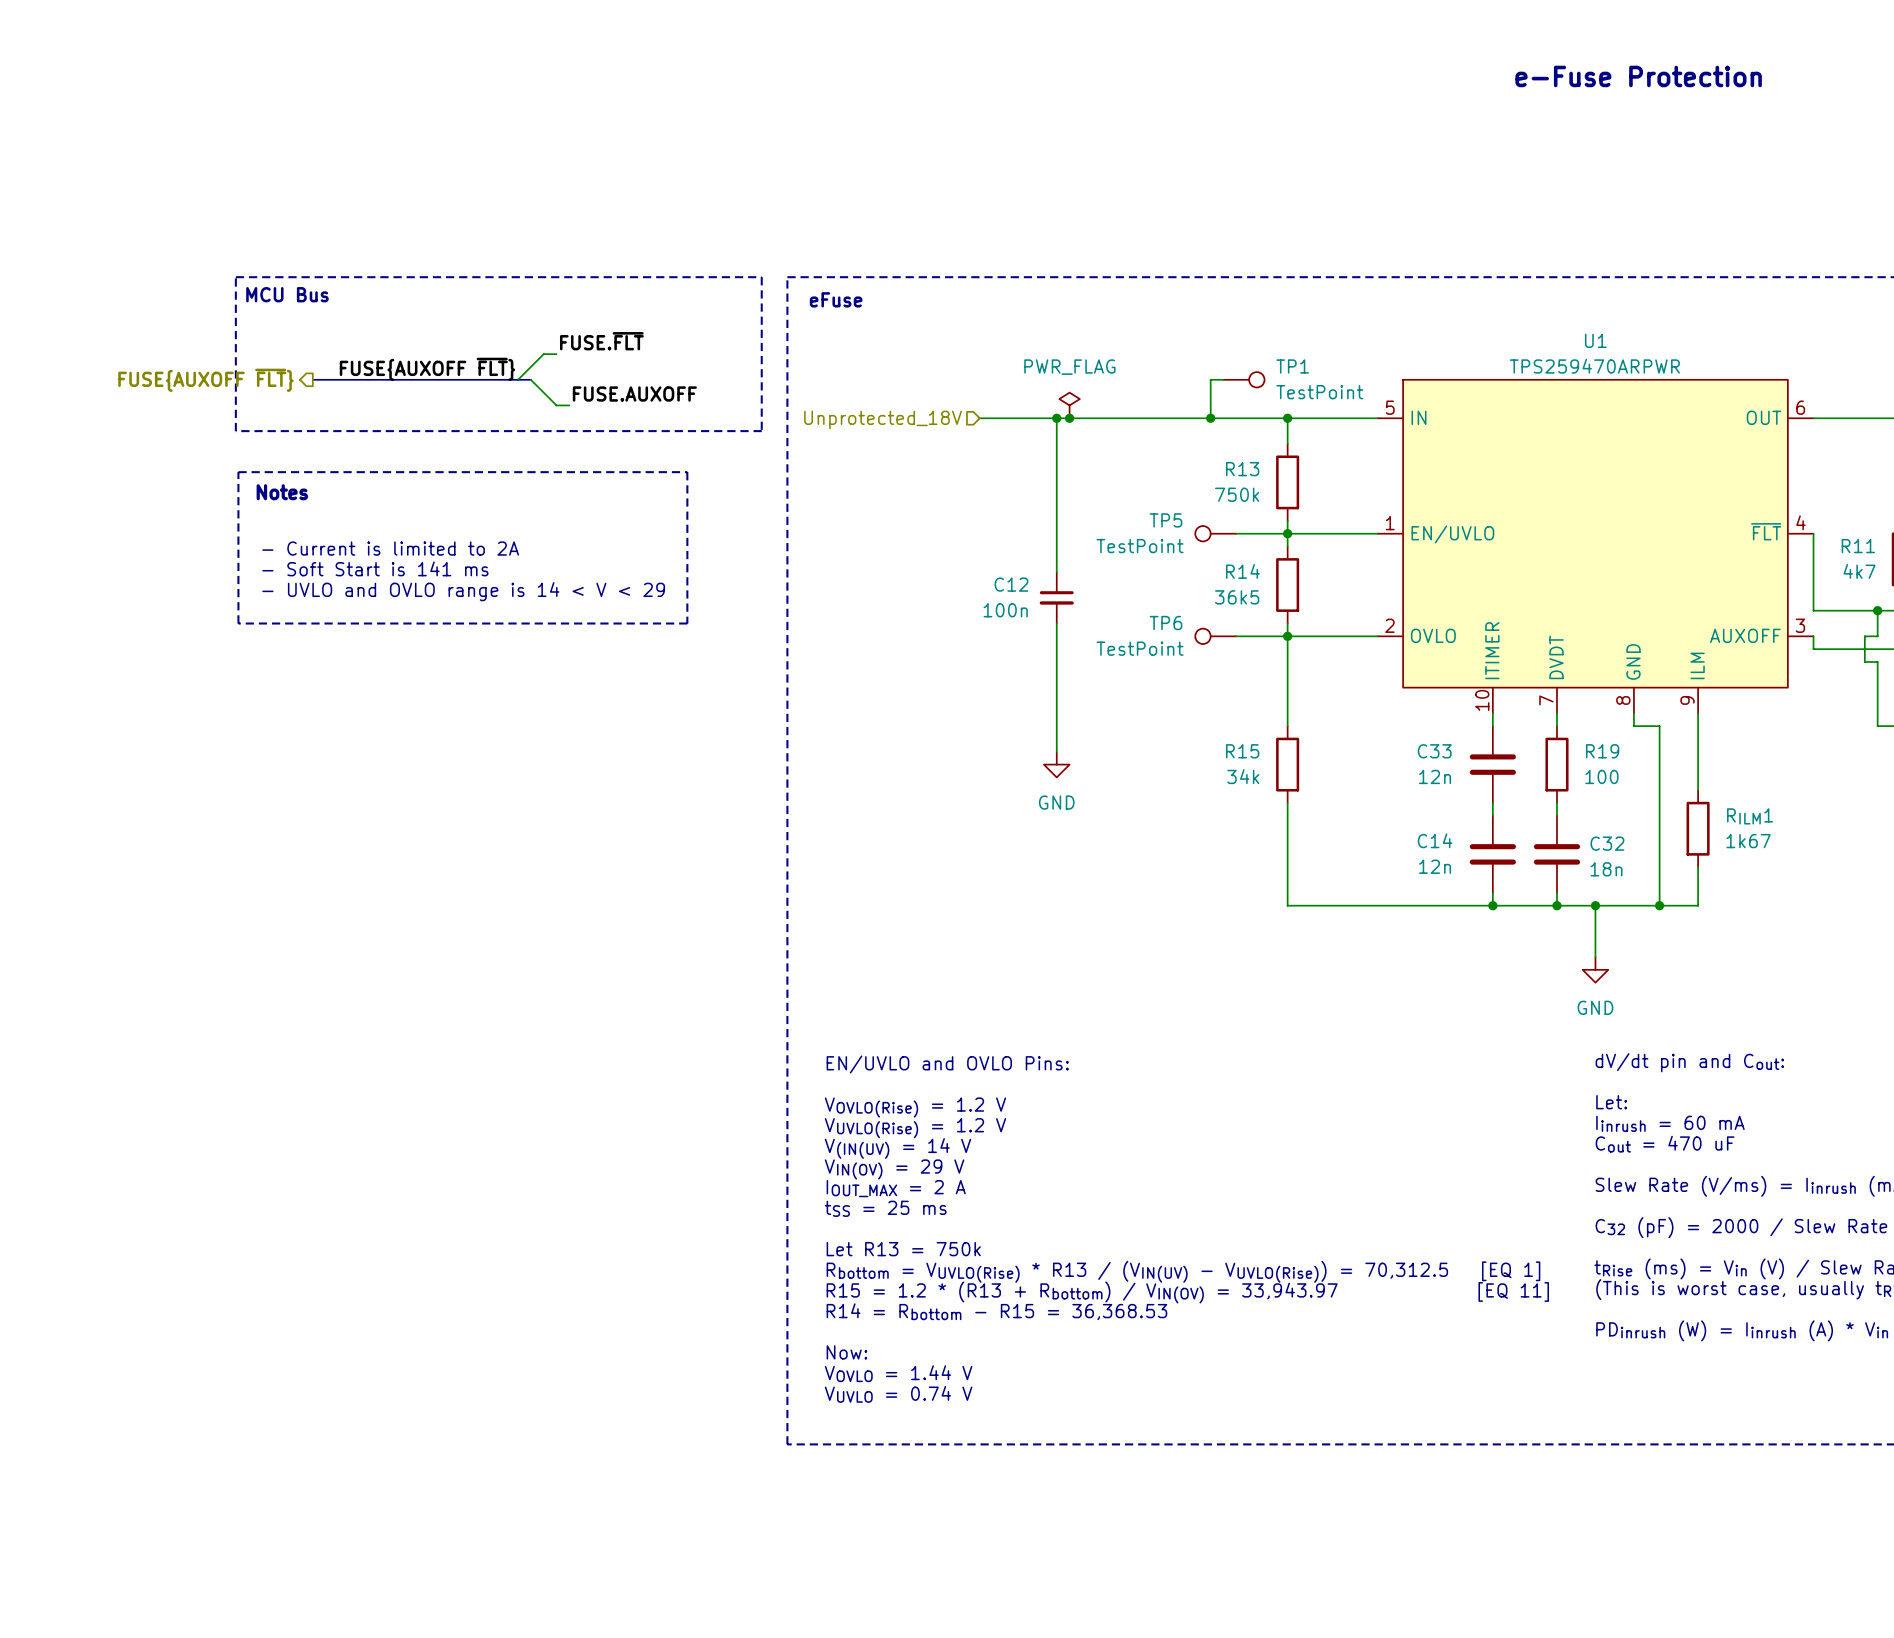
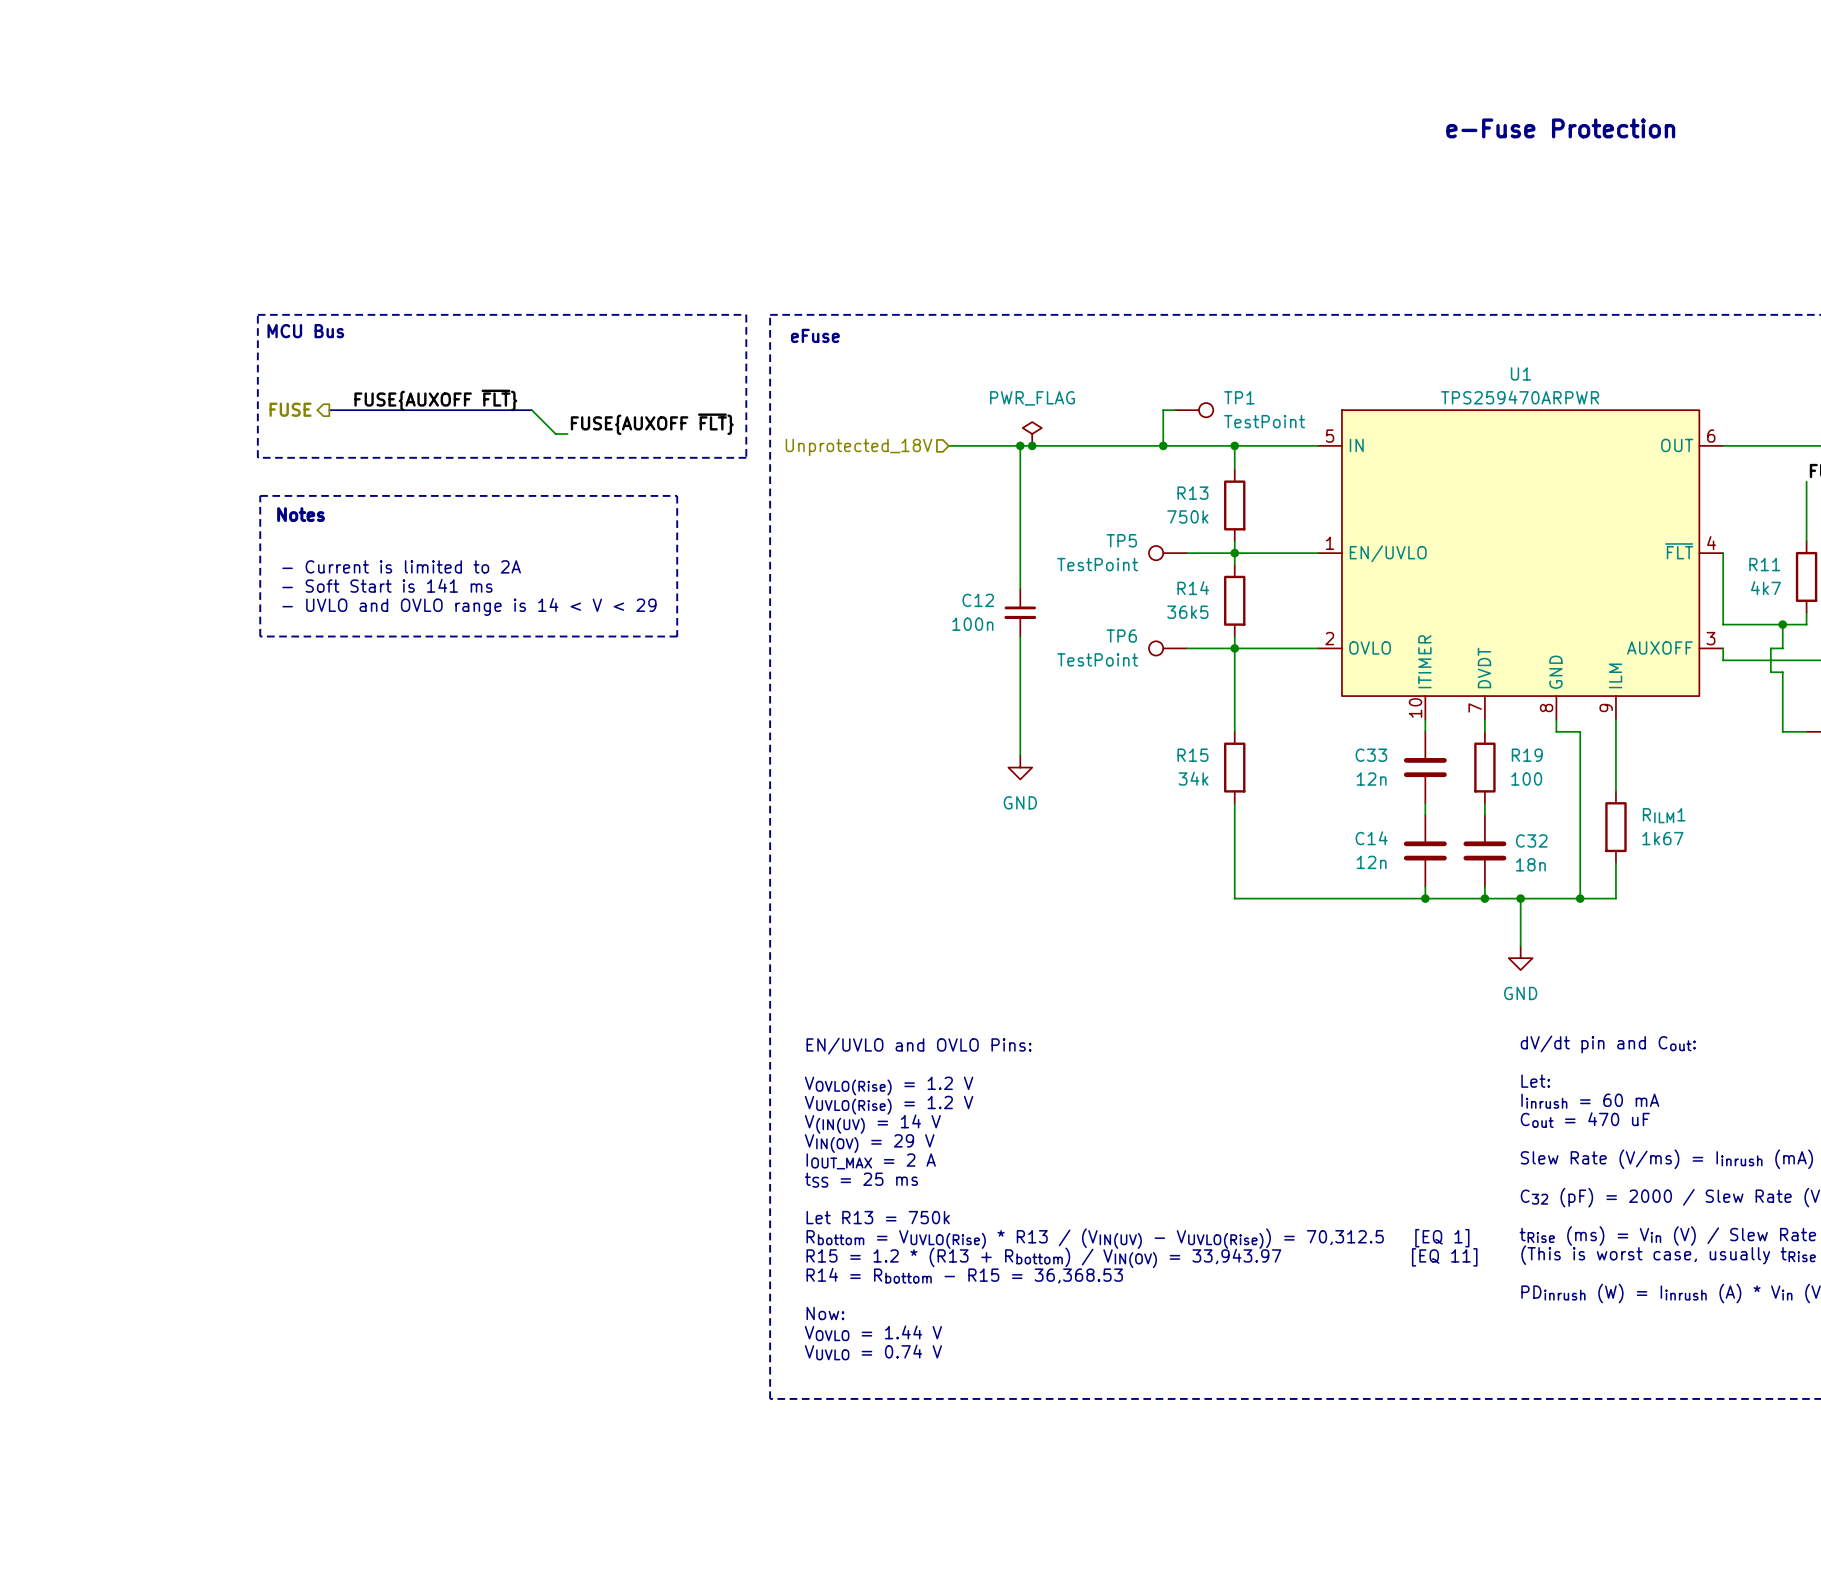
label: FUSE.~{FLT} (601, 341) -> none
wire: (556, 354) (543, 354) (518, 379) -> none
hierarchical label: FUSE{AUXOFF ~{FLT}} (205, 380) -> FUSE (290, 409)
label: FUSE.AUXOFF (634, 394) -> FUSE{AUXOFF ~{FLT}} (652, 424)

